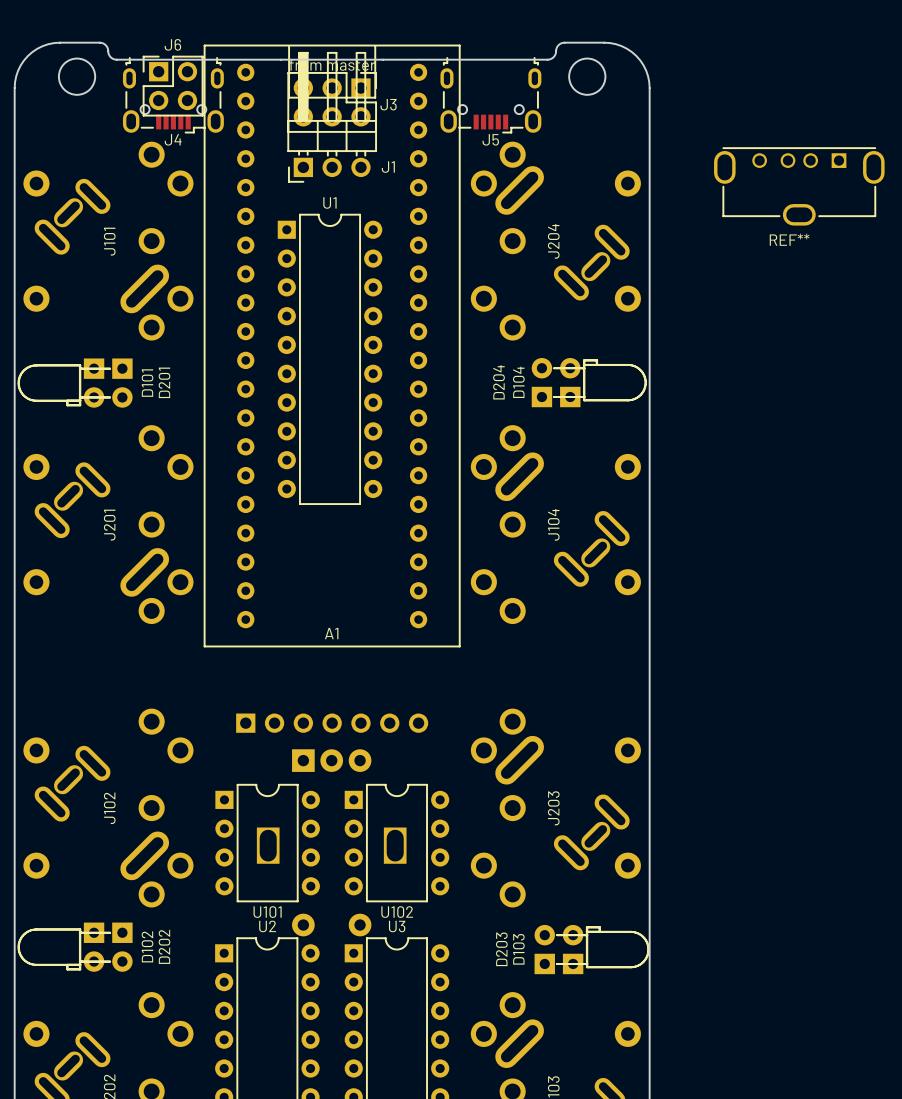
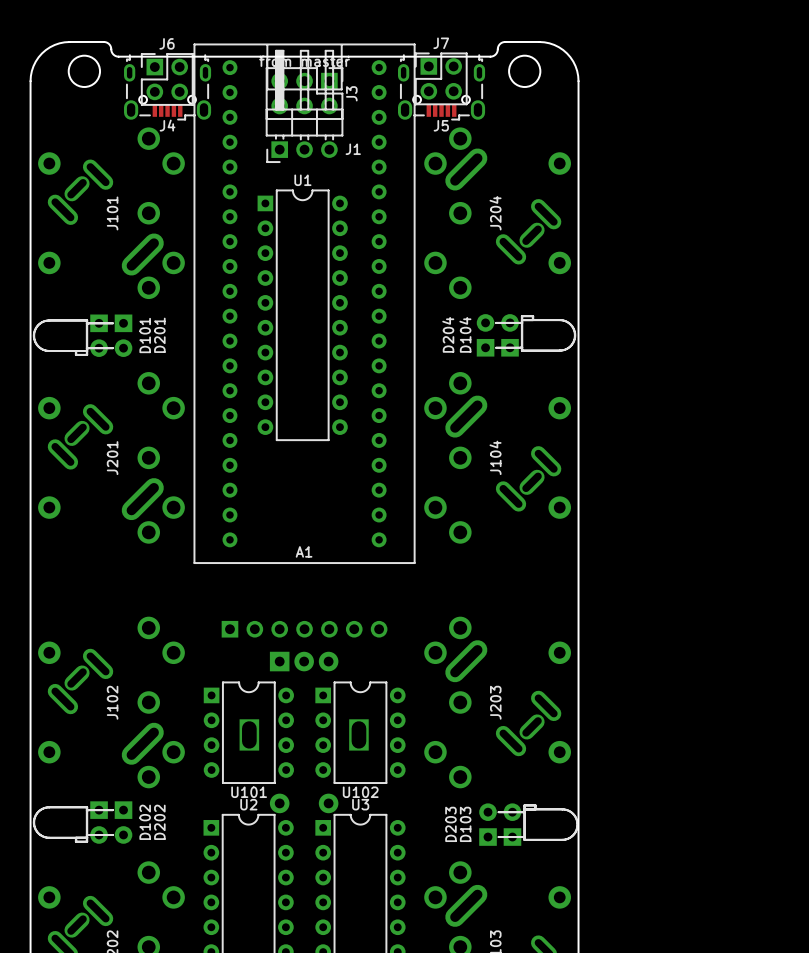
J7: none -> (441, 78)
J3 name rotation: 0° (388, 104) -> 90° counterclockwise (351, 93)
REF**: (799, 186) -> none

